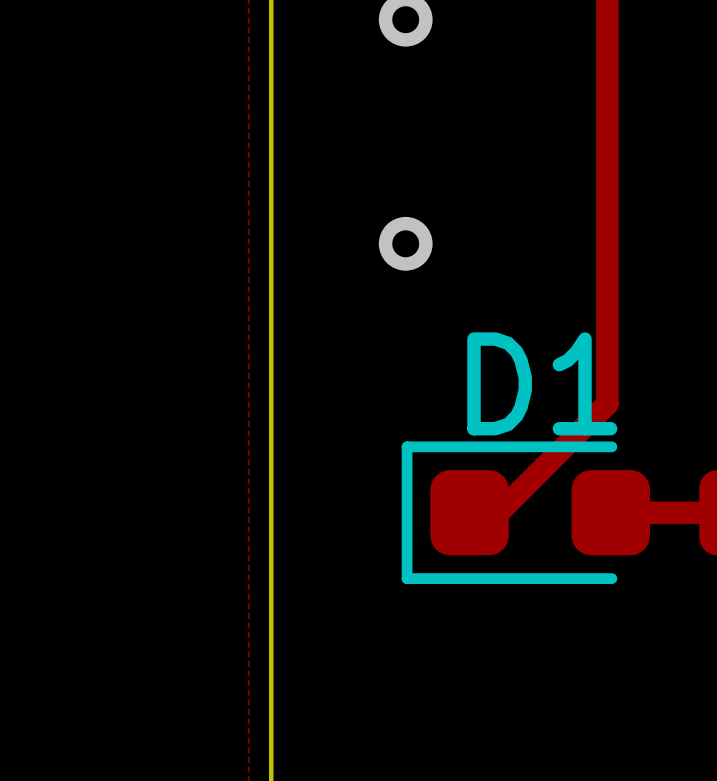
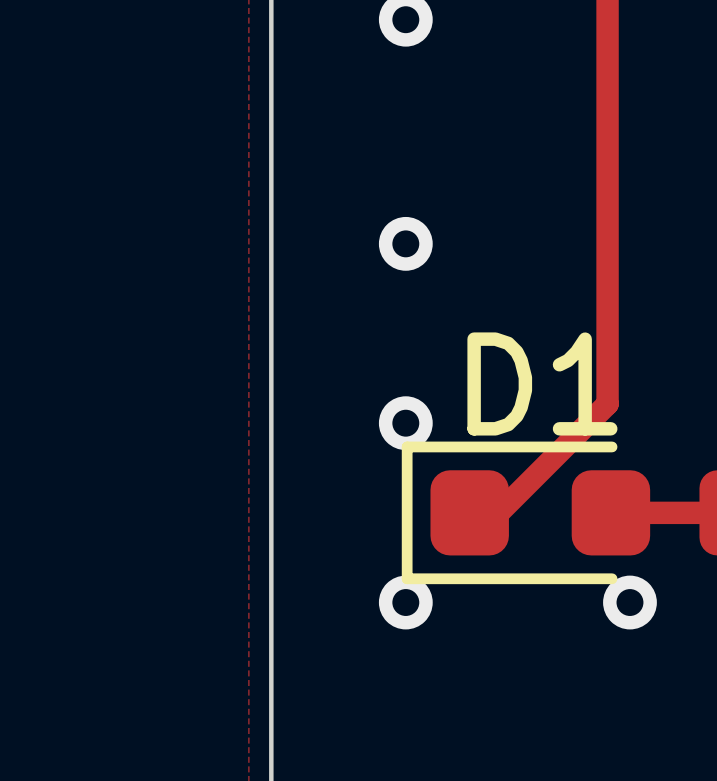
via: none -> (405, 423)
via: none -> (405, 602)
via: none -> (629, 602)

